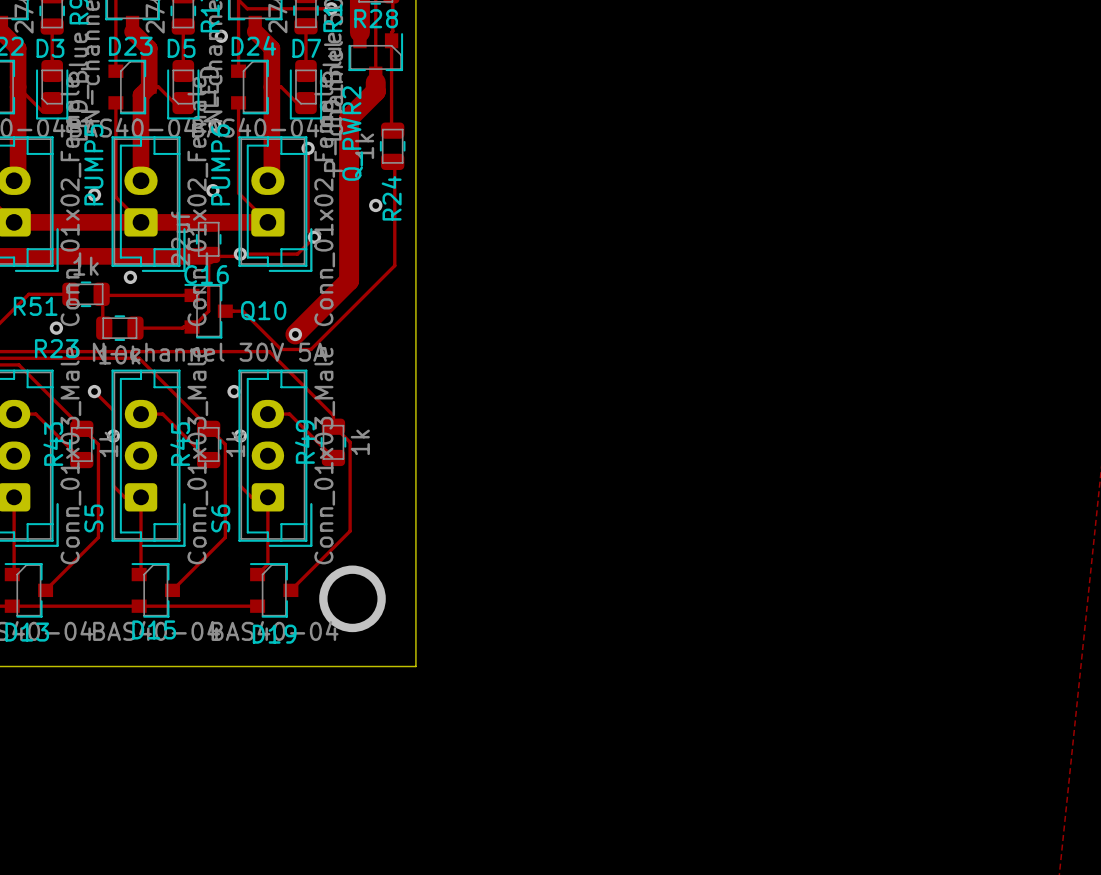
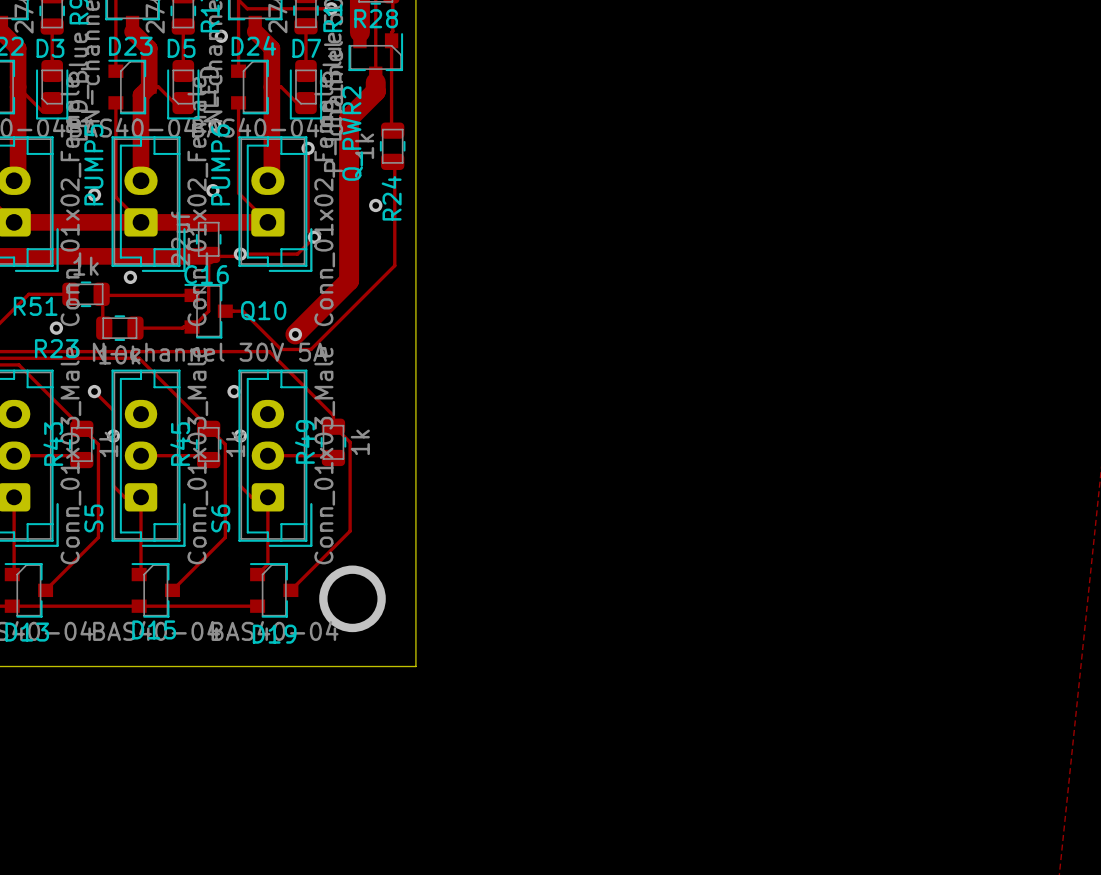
track: (14, 414) (35, 414) (81, 460) -> none
track: (141, 414) (162, 414) (208, 460) -> none
track: (267, 414) (289, 414) (333, 457) -> none
track: none -> (14, 455) (76, 455)
track: none -> (141, 455) (203, 455)
track: none -> (267, 455) (330, 455)

